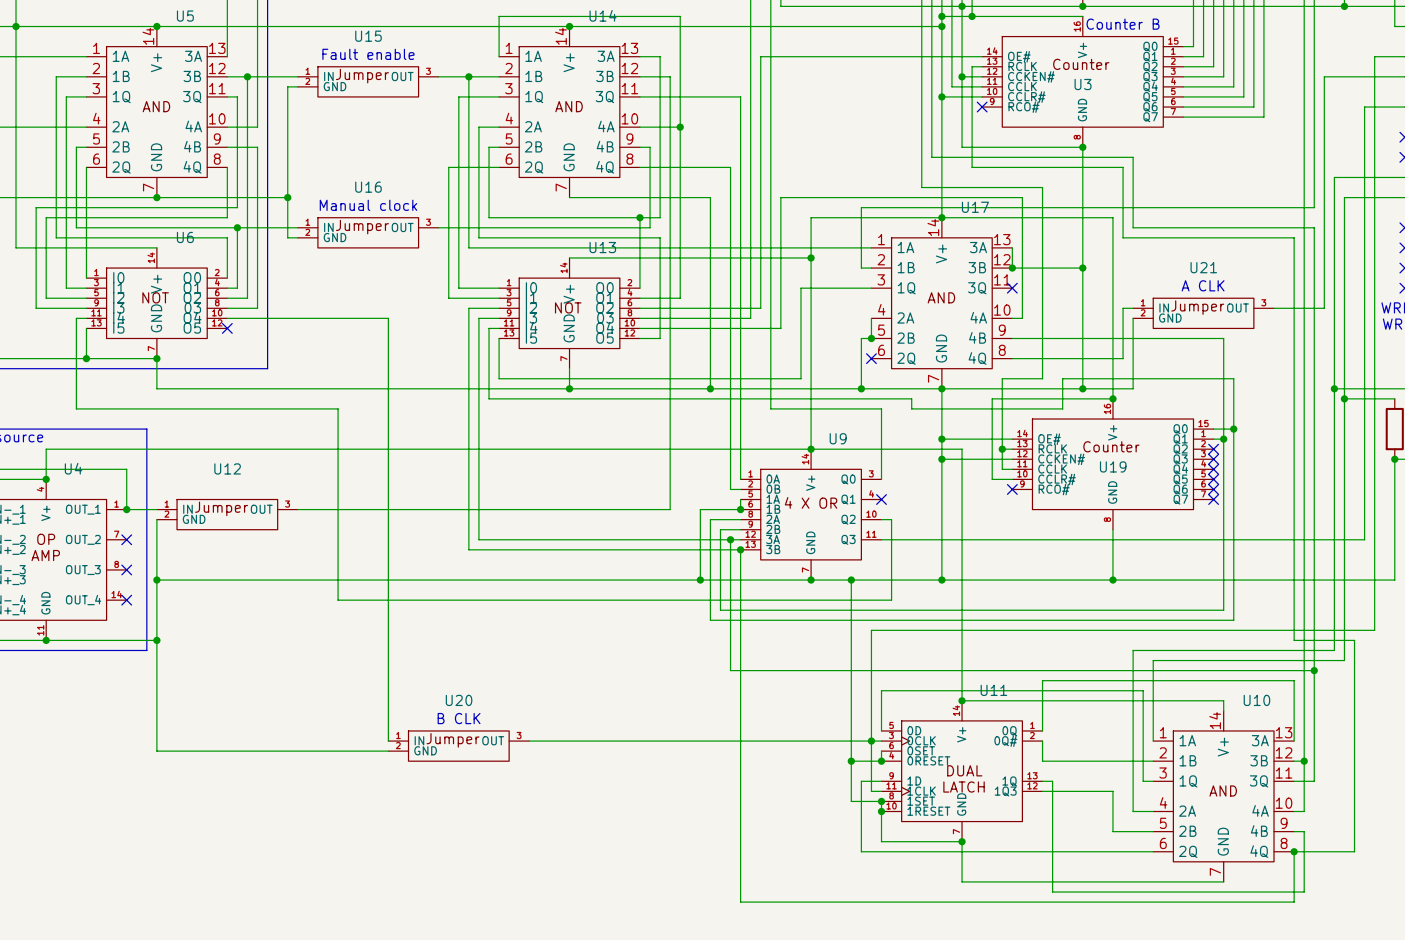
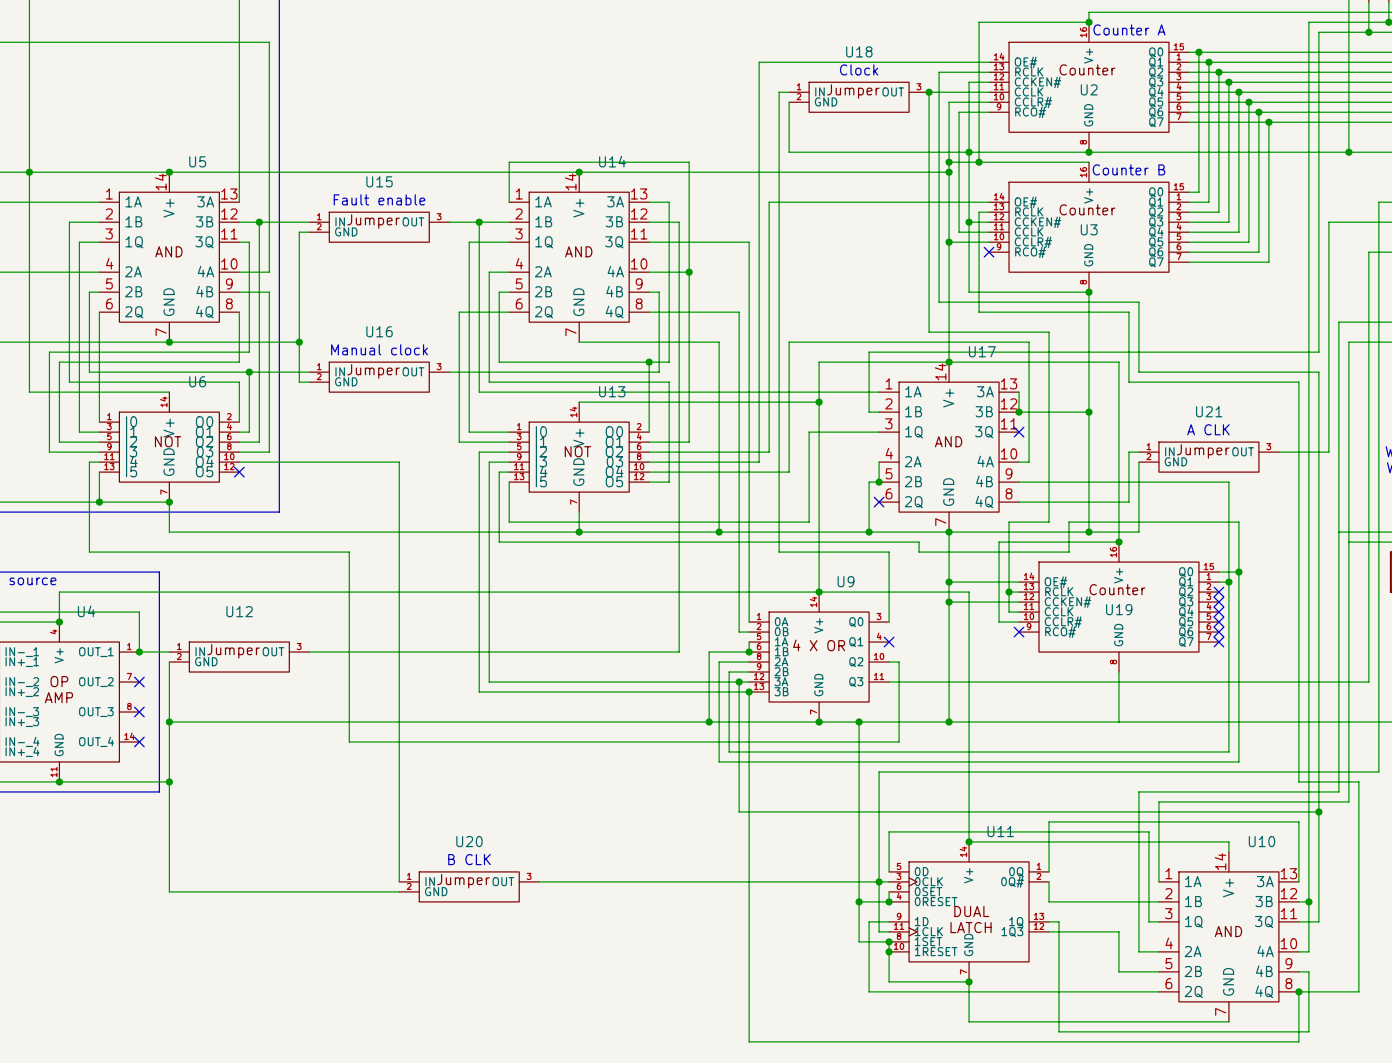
junction: (1334, 388) -> none
junction: (1344, 398) -> none
junction: (1112, 580) -> none

